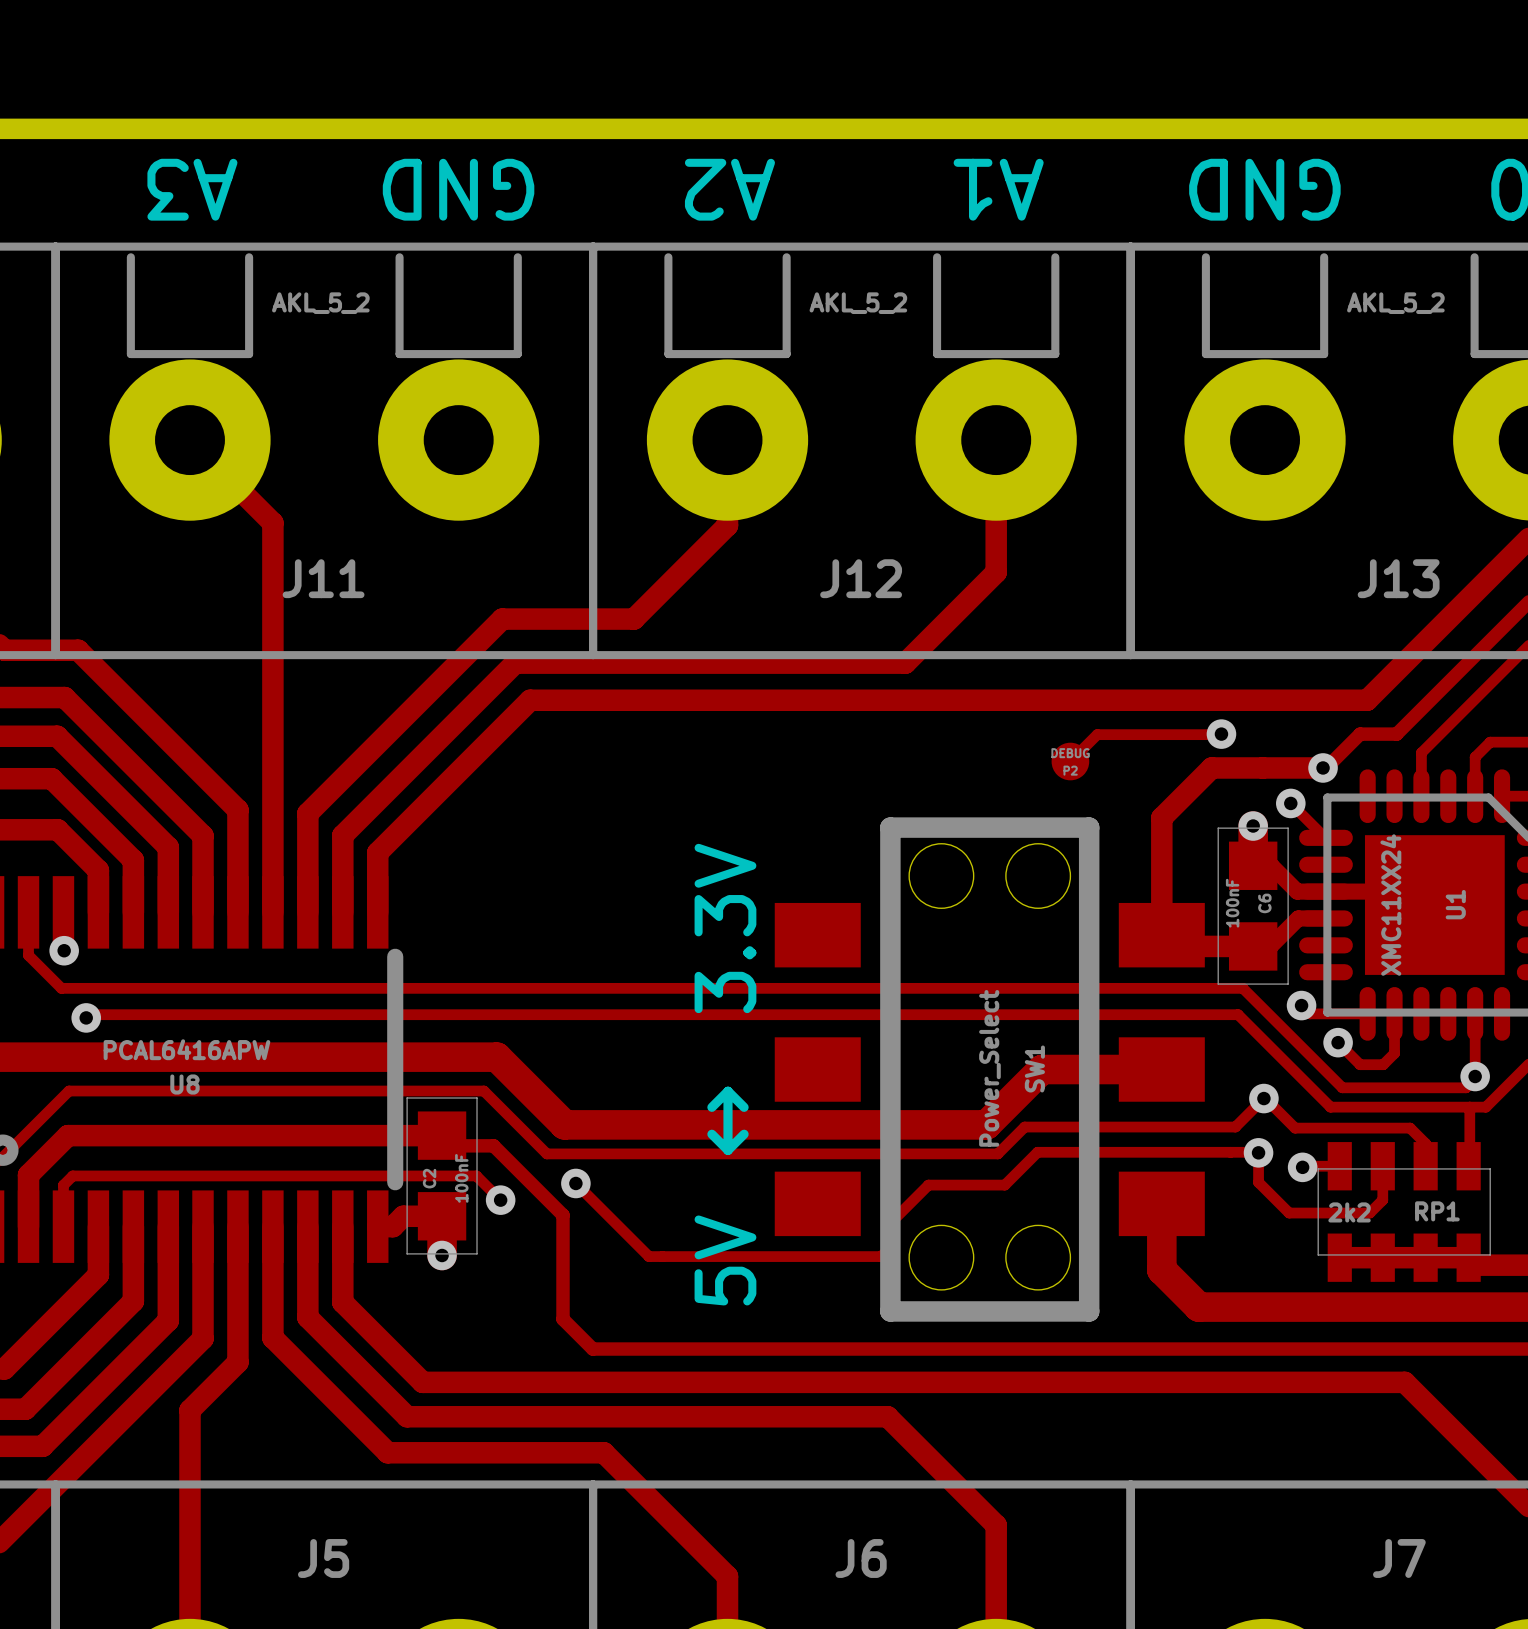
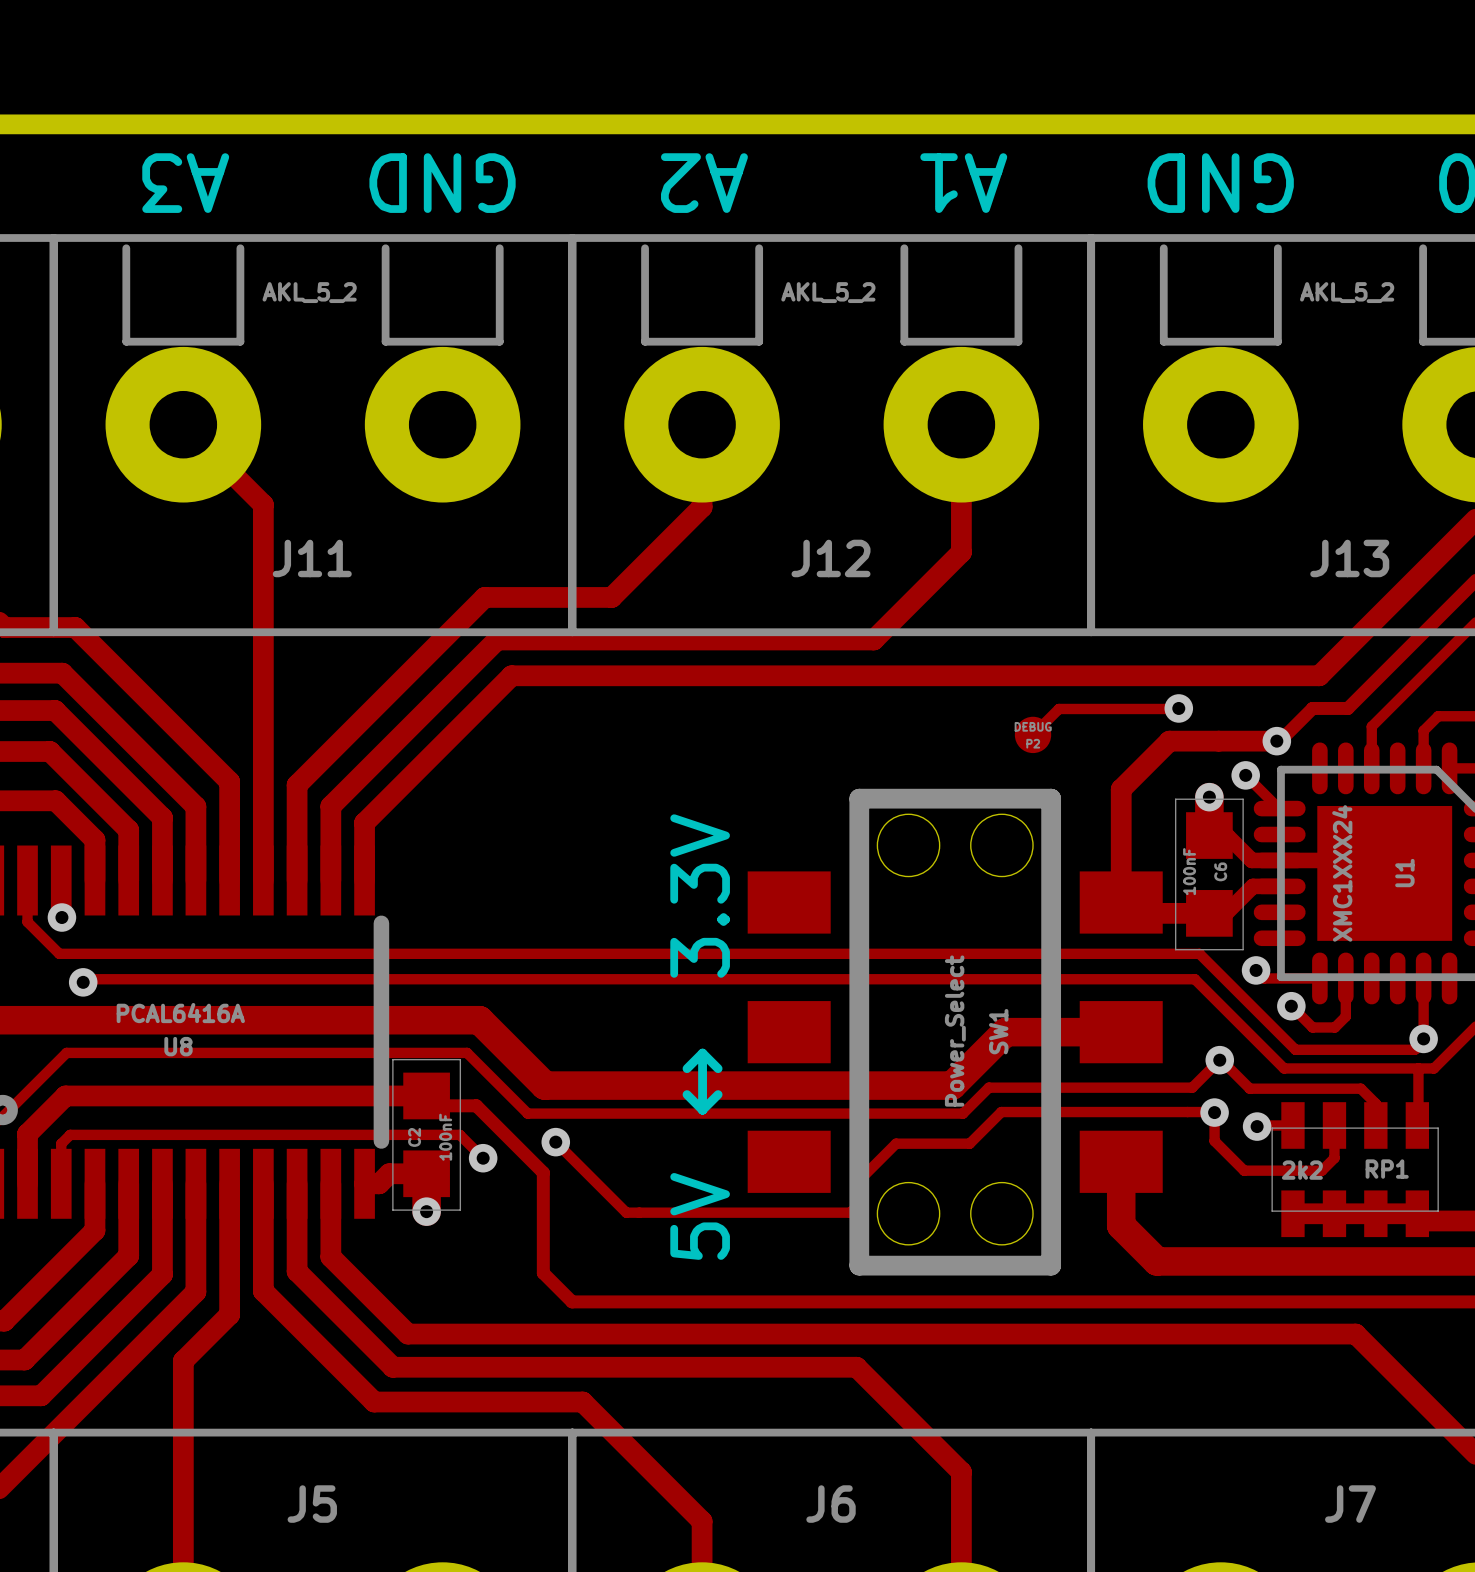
U1 value: XMC11XX24 (1390, 905) -> XMC1XXX24 (1342, 873)
U8 value: PCAL6416APW (186, 1049) -> PCAL6416A (180, 1013)

